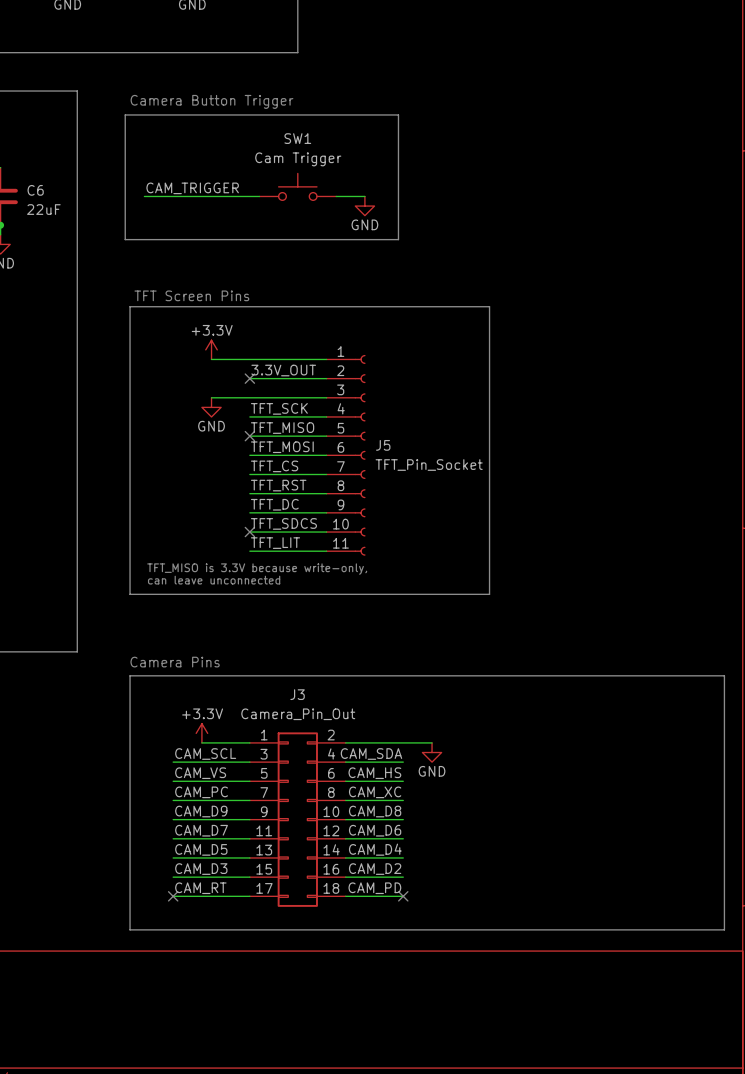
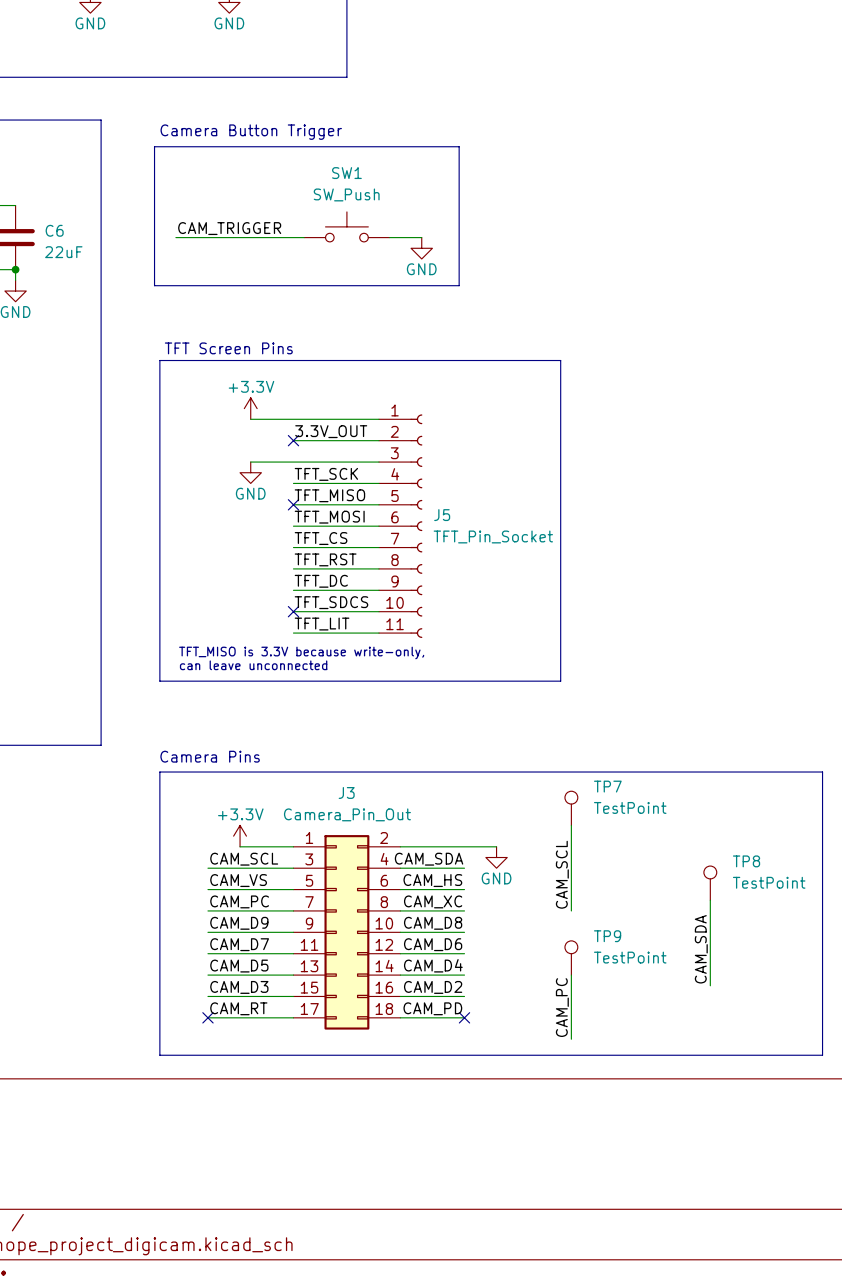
SW1 value: Cam Trigger (298, 159) -> SW_Push (346, 194)
TP7: none -> TestPoint (571, 808)
wire: none -> (571, 825) (571, 910)
label: none -> CAM_SCL (562, 874)
TP8: none -> TestPoint (710, 883)
wire: none -> (710, 900) (710, 985)
label: none -> CAM_SDA (701, 949)
TP9: none -> TestPoint (571, 957)
wire: none -> (571, 975) (571, 1039)
label: none -> CAM_PC (562, 1007)

